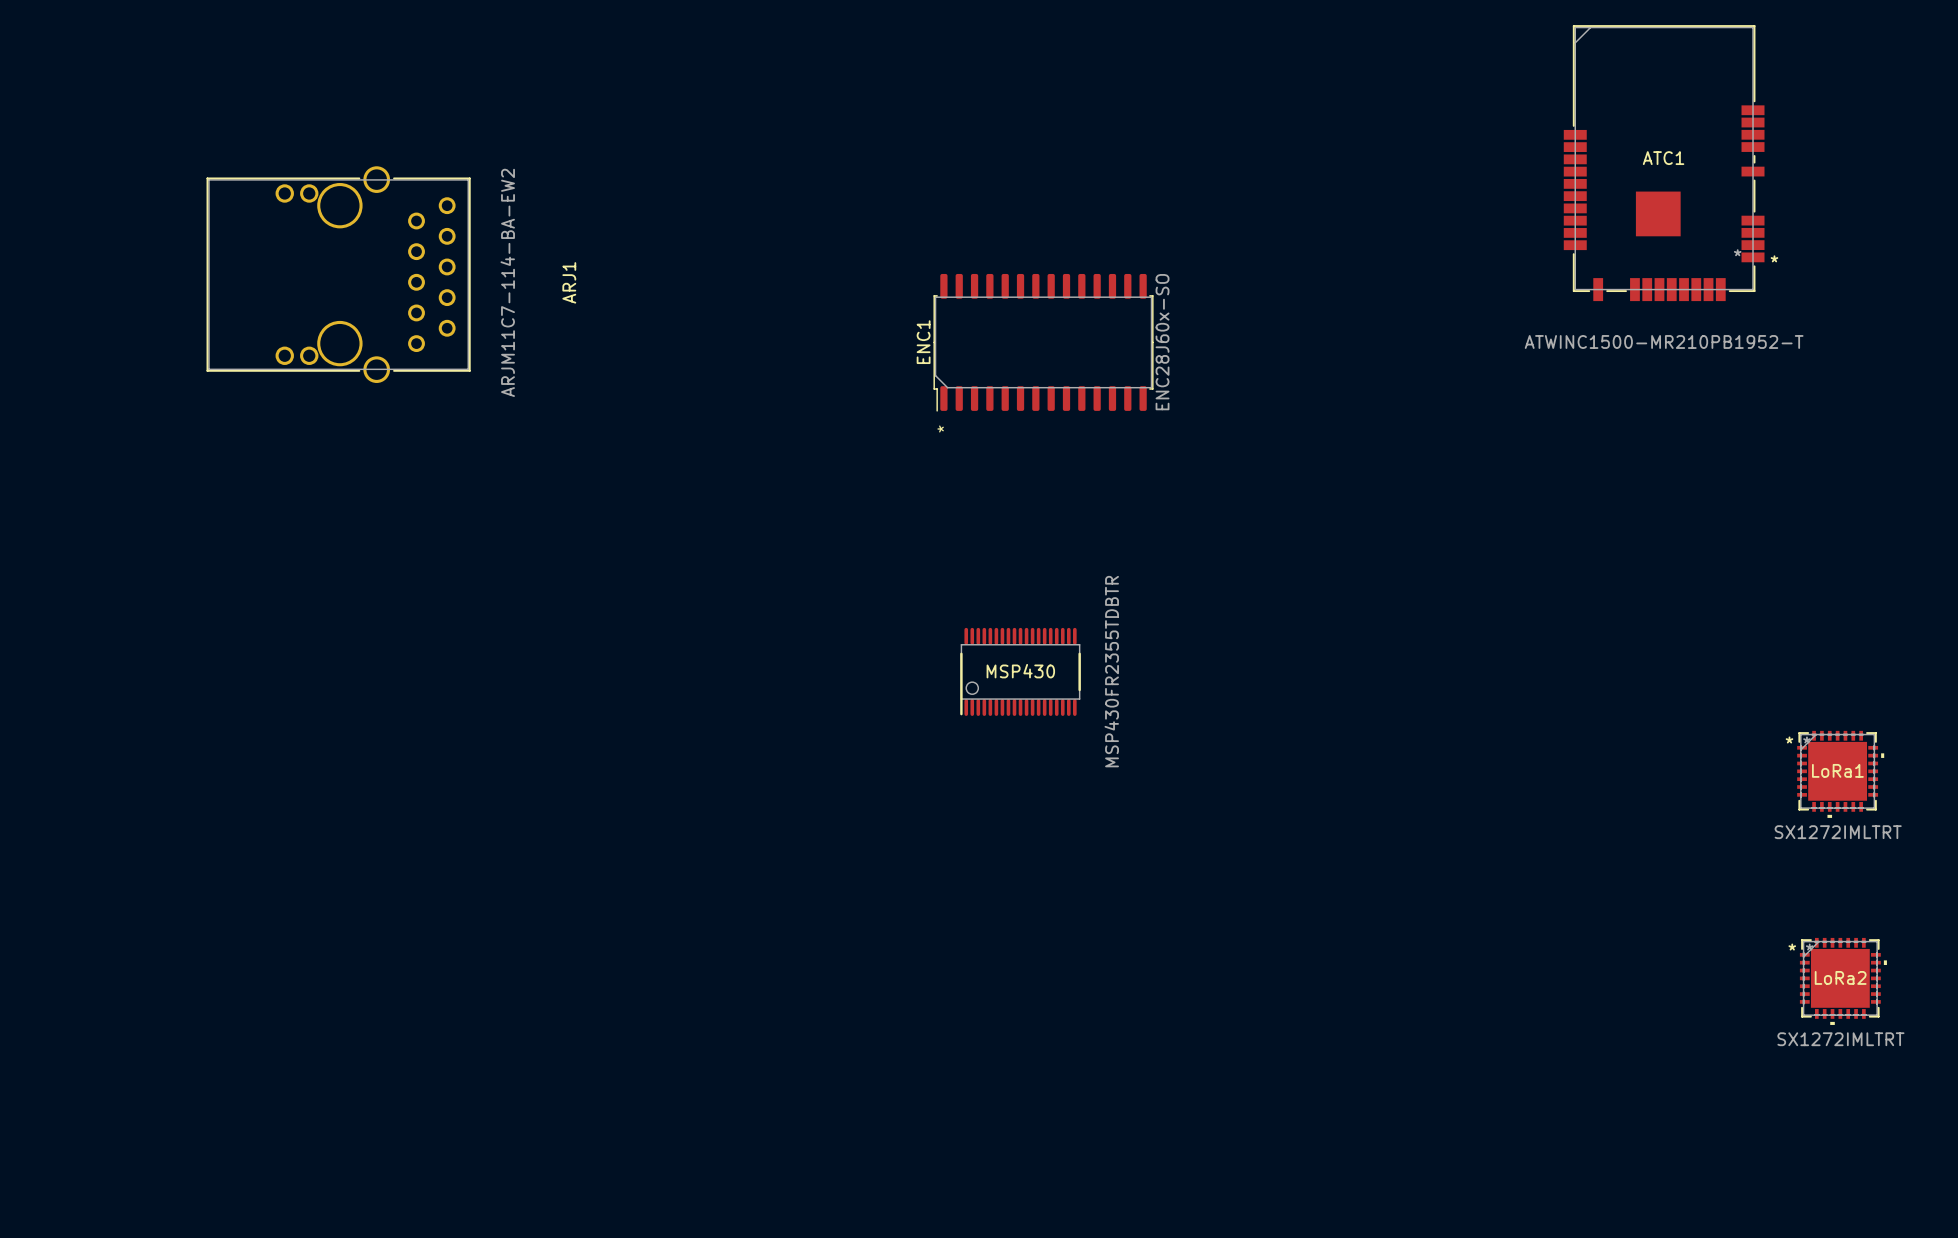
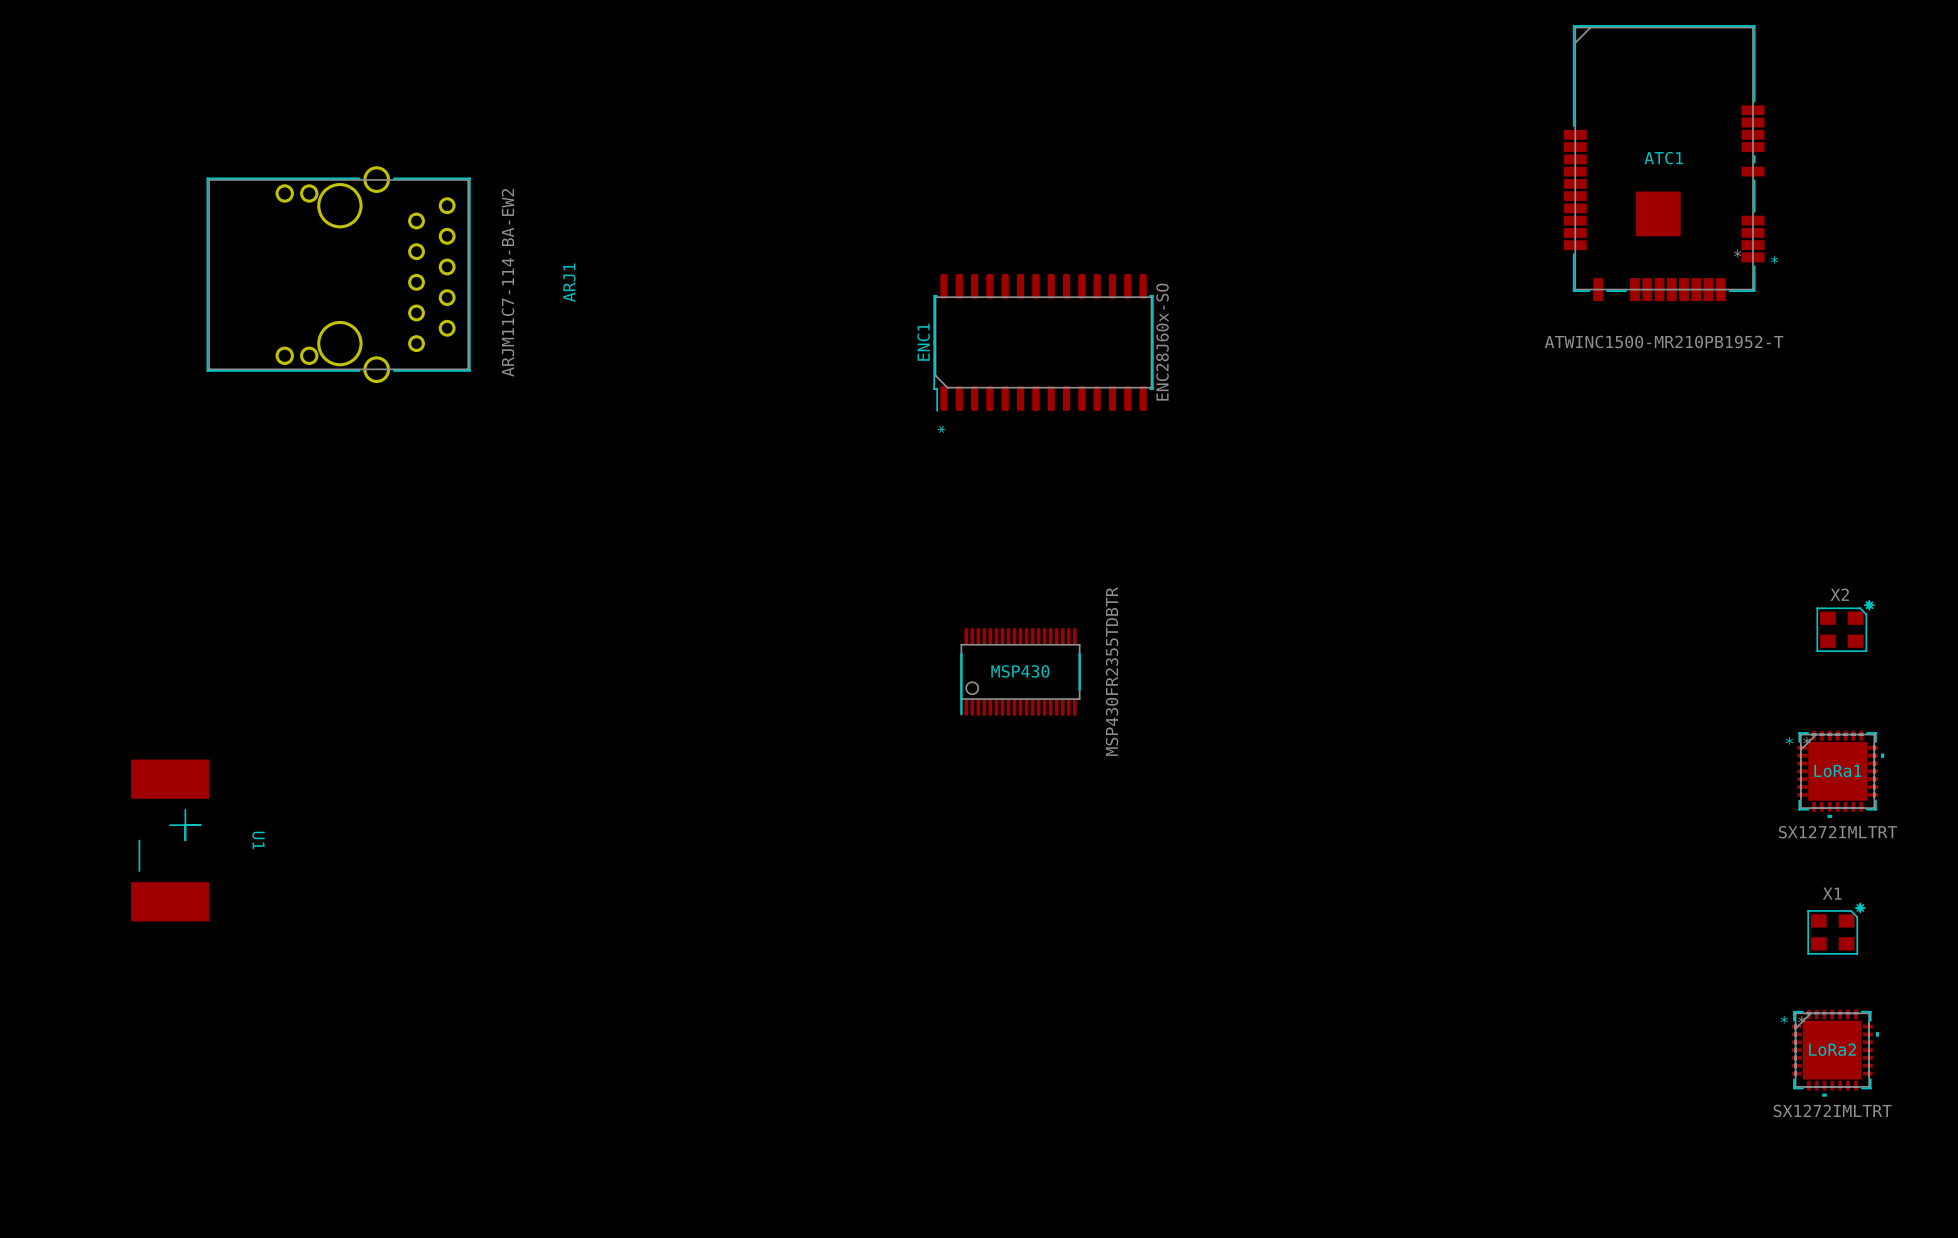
X2: none -> (1845, 625)
U1: none -> (170, 840)
X1: none -> (1836, 928)
LoRa2 position: (1843, 981) -> (1835, 1053)

